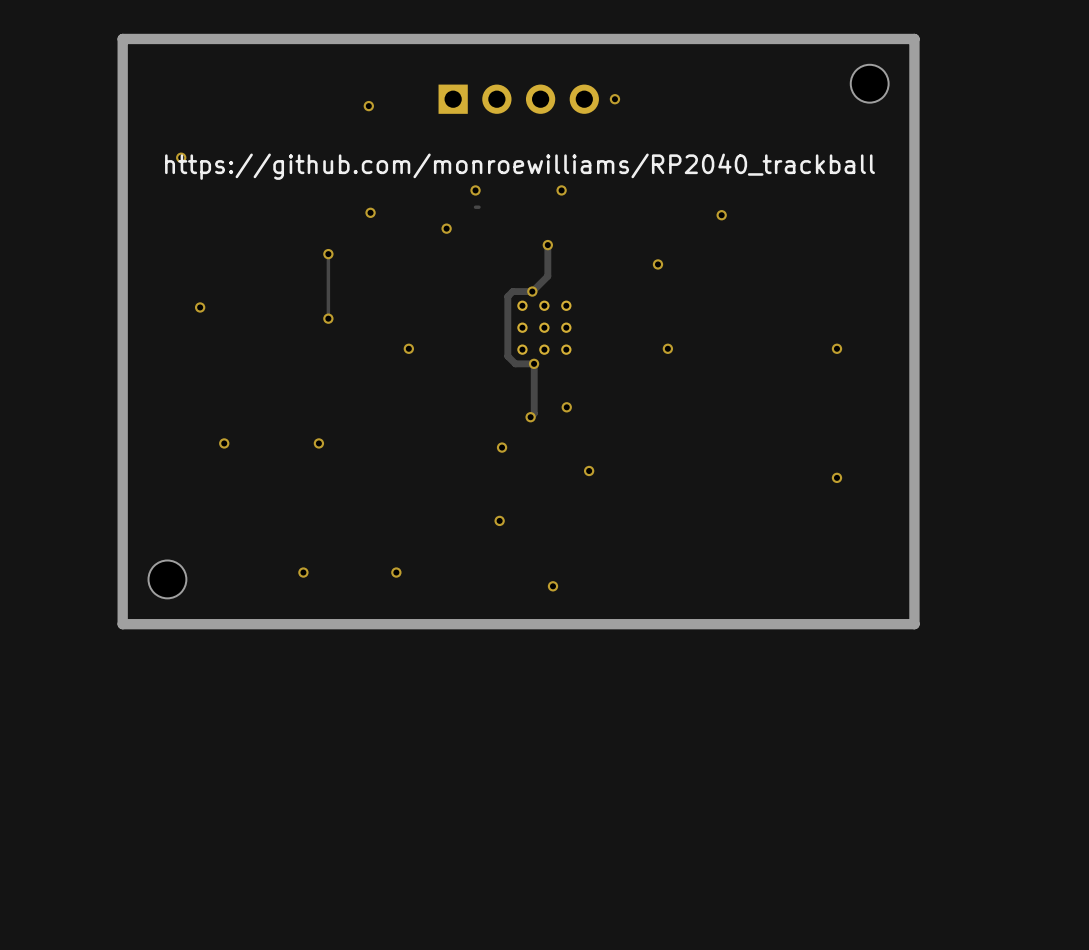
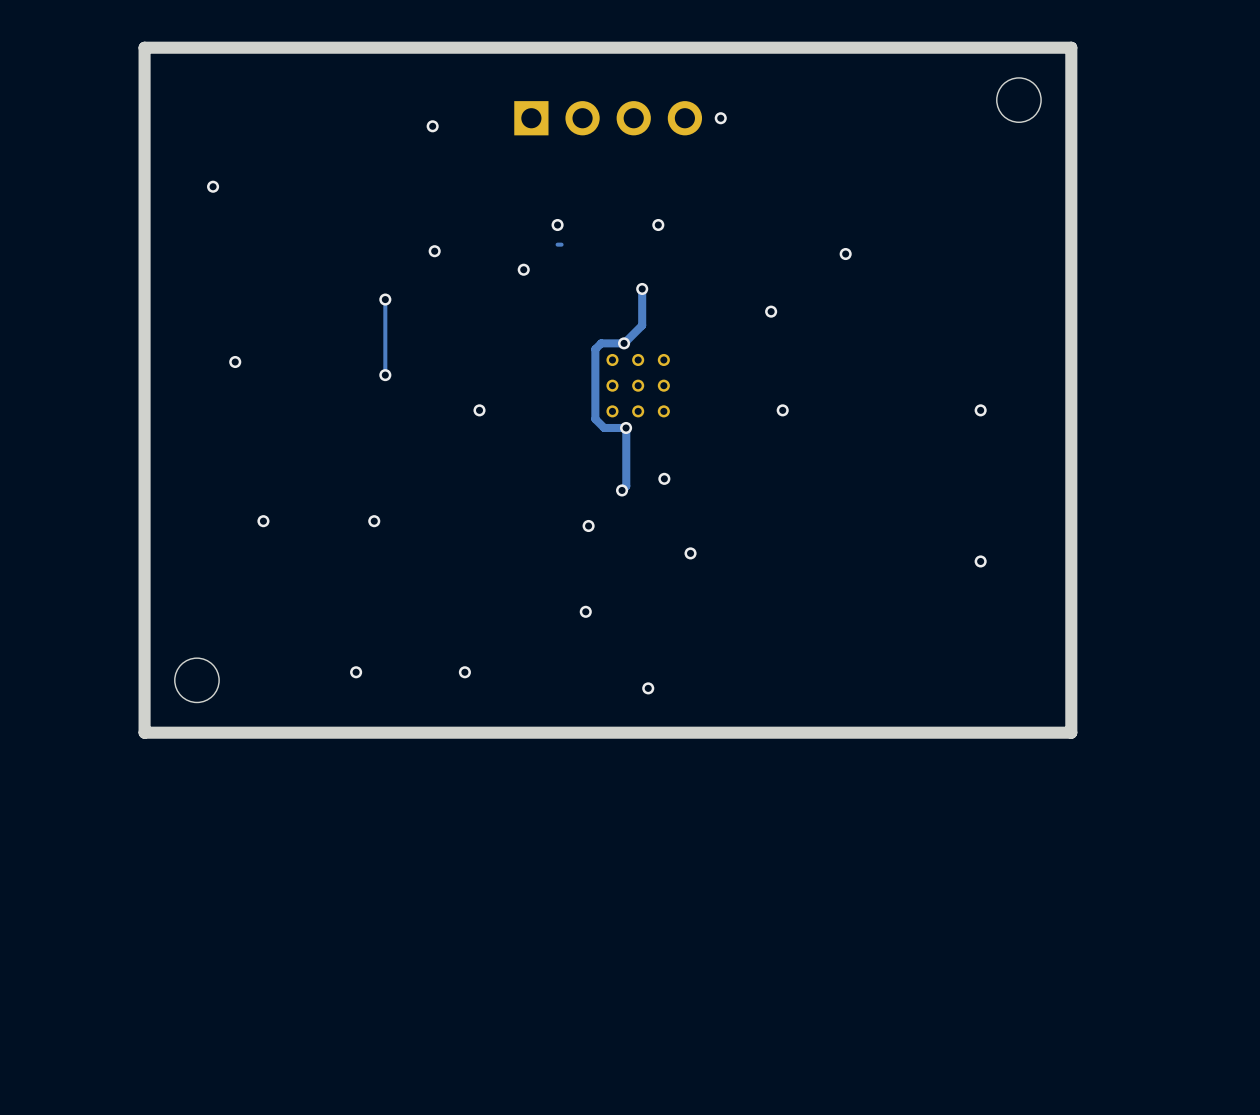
text: https://github.com/monroewilliams/RP2040_trackball (520, 166) -> none

